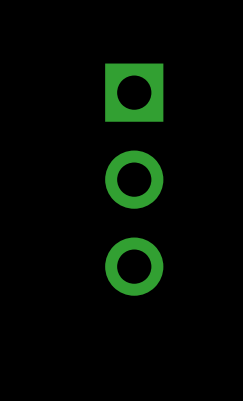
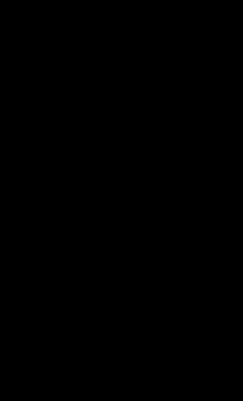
part: (134, 179) -> none

